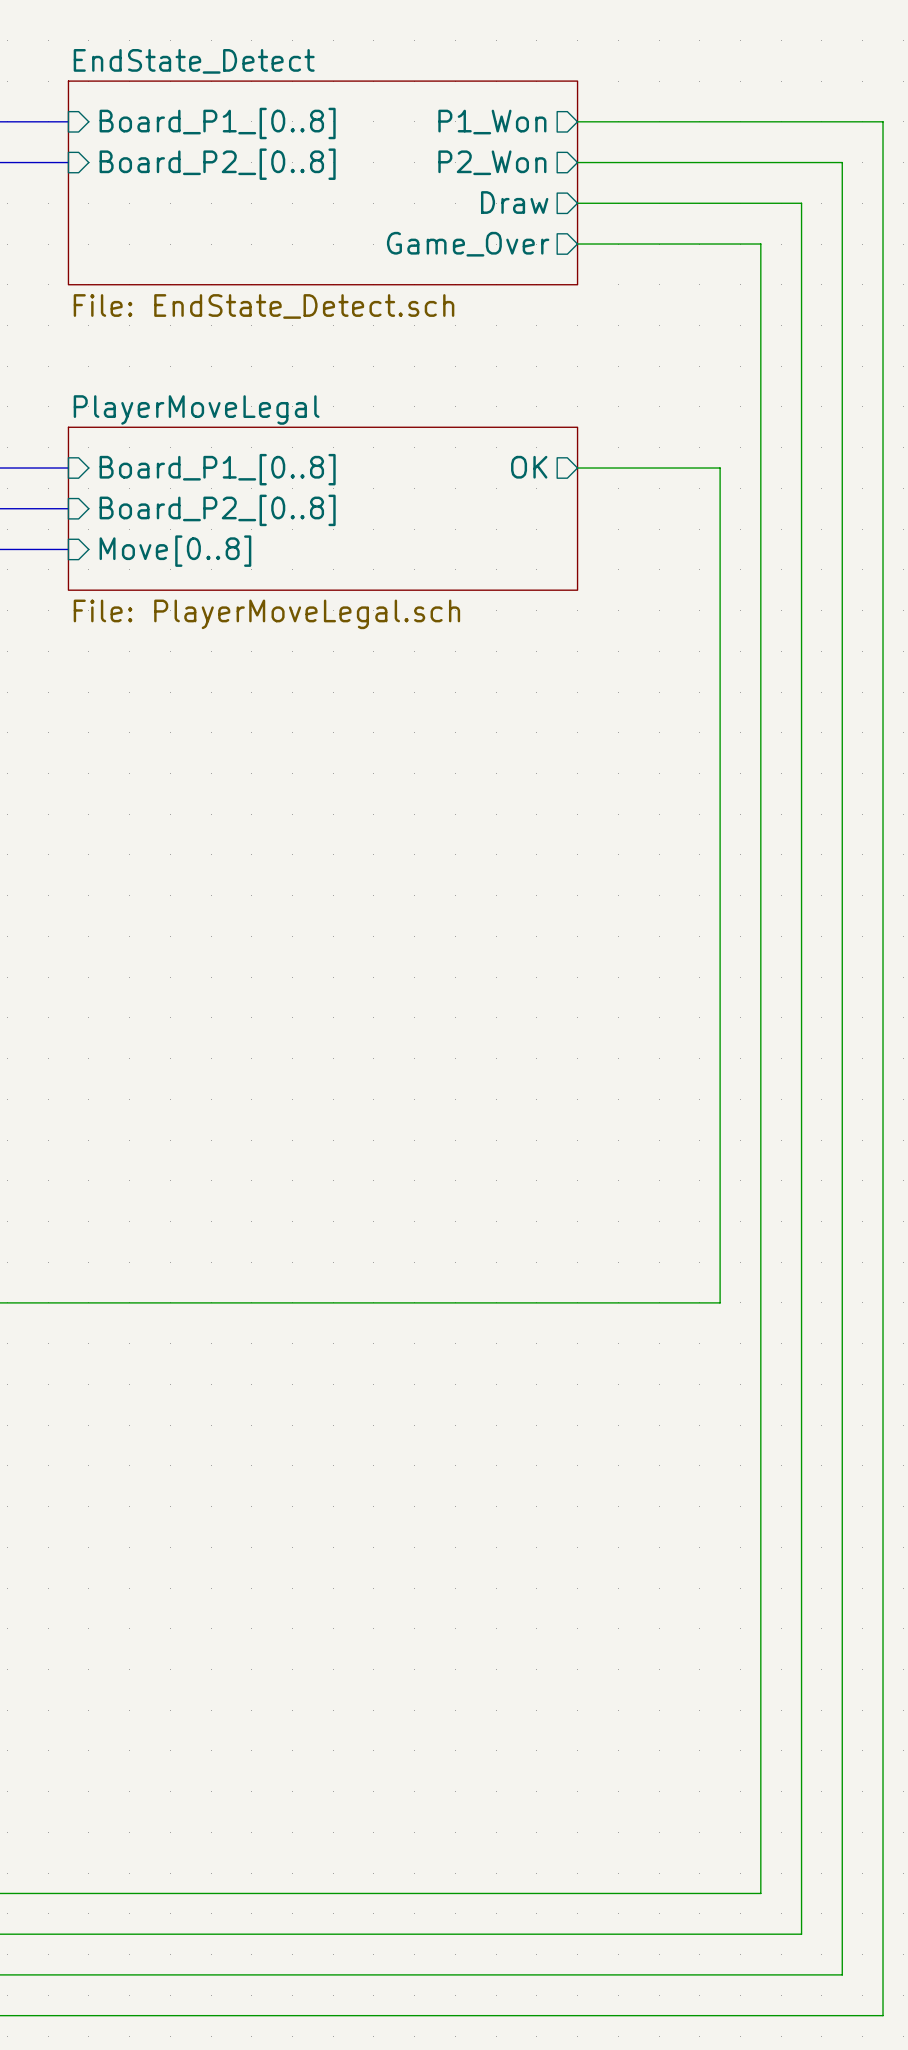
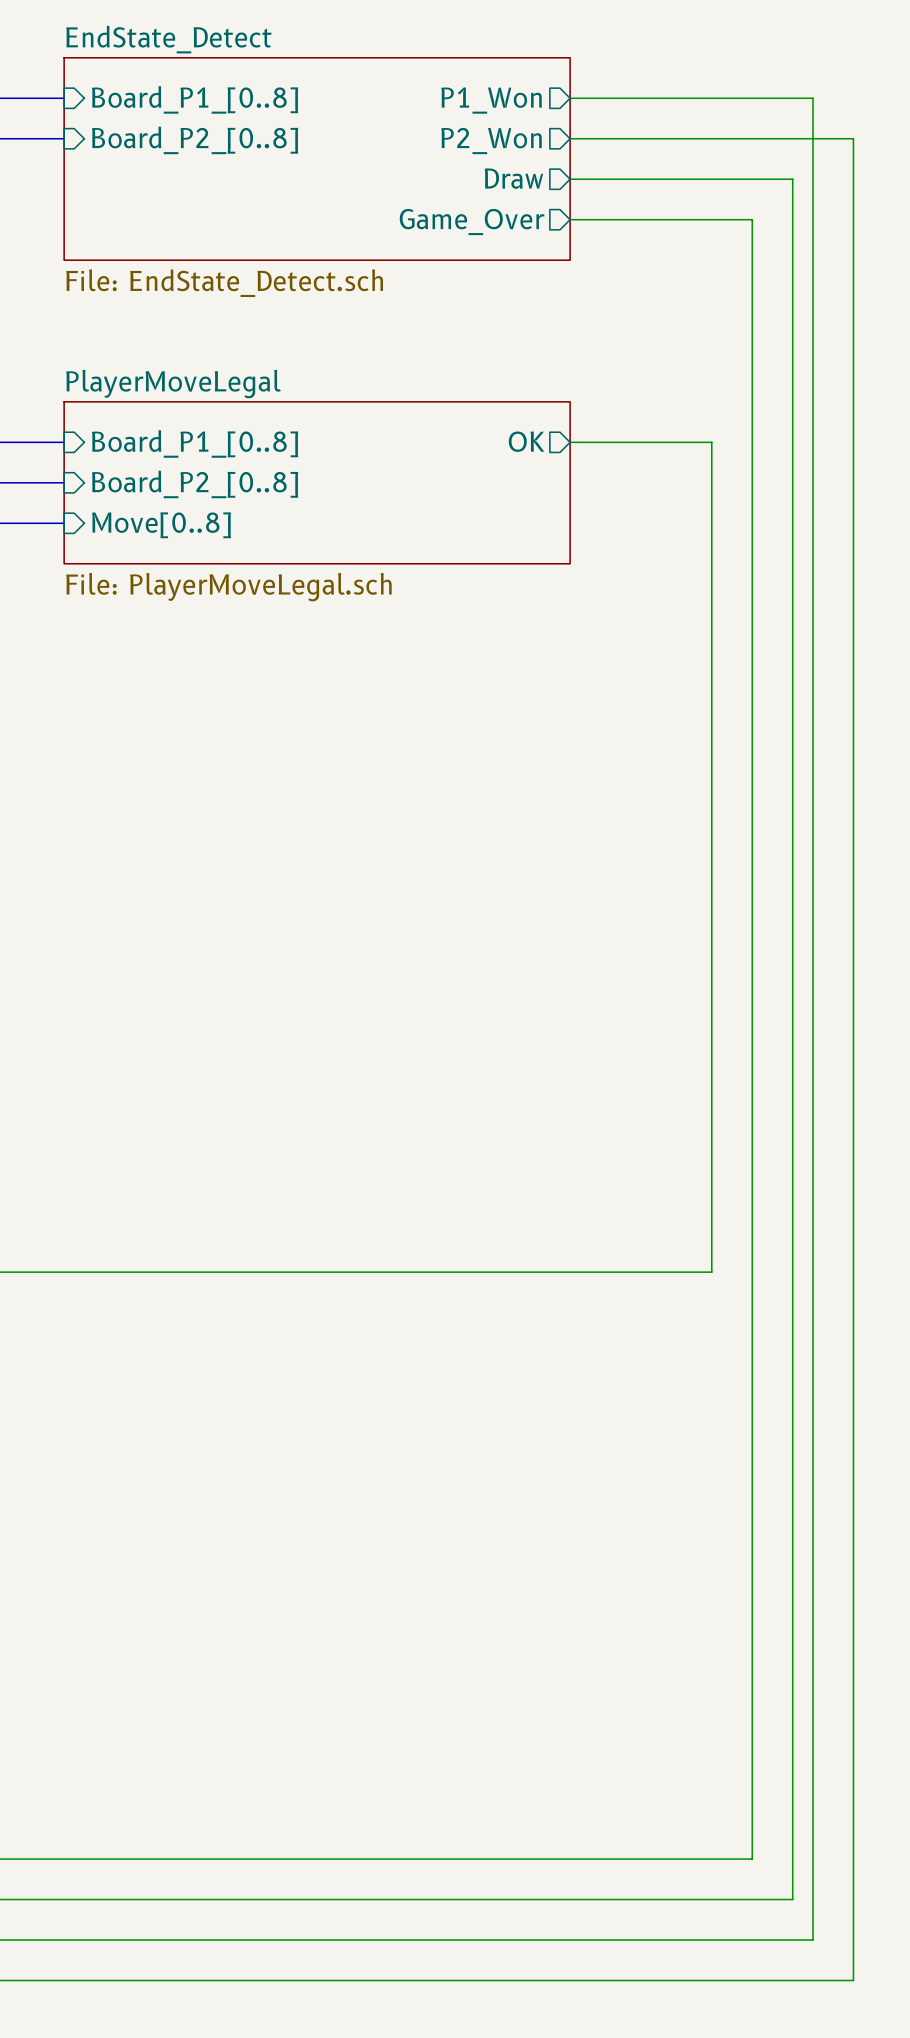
wire: (821, 121) (883, 121) (883, 2015) (862, 2015) -> (833, 138) (853, 138) (853, 1980)
wire: (842, 162) (842, 1974) (821, 1974) -> (812, 98) (812, 1940)

